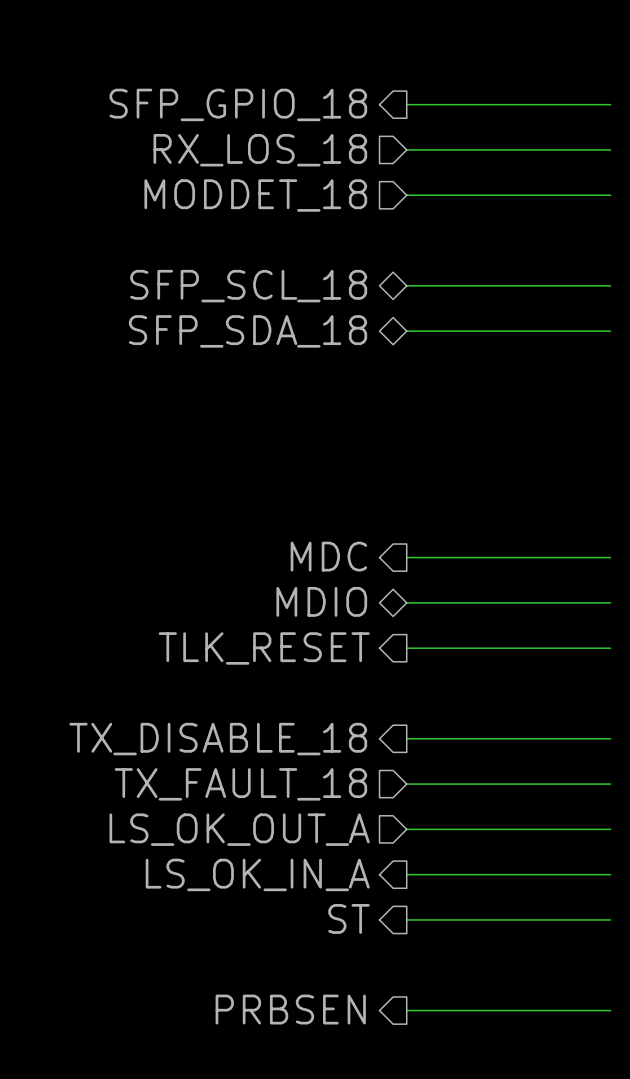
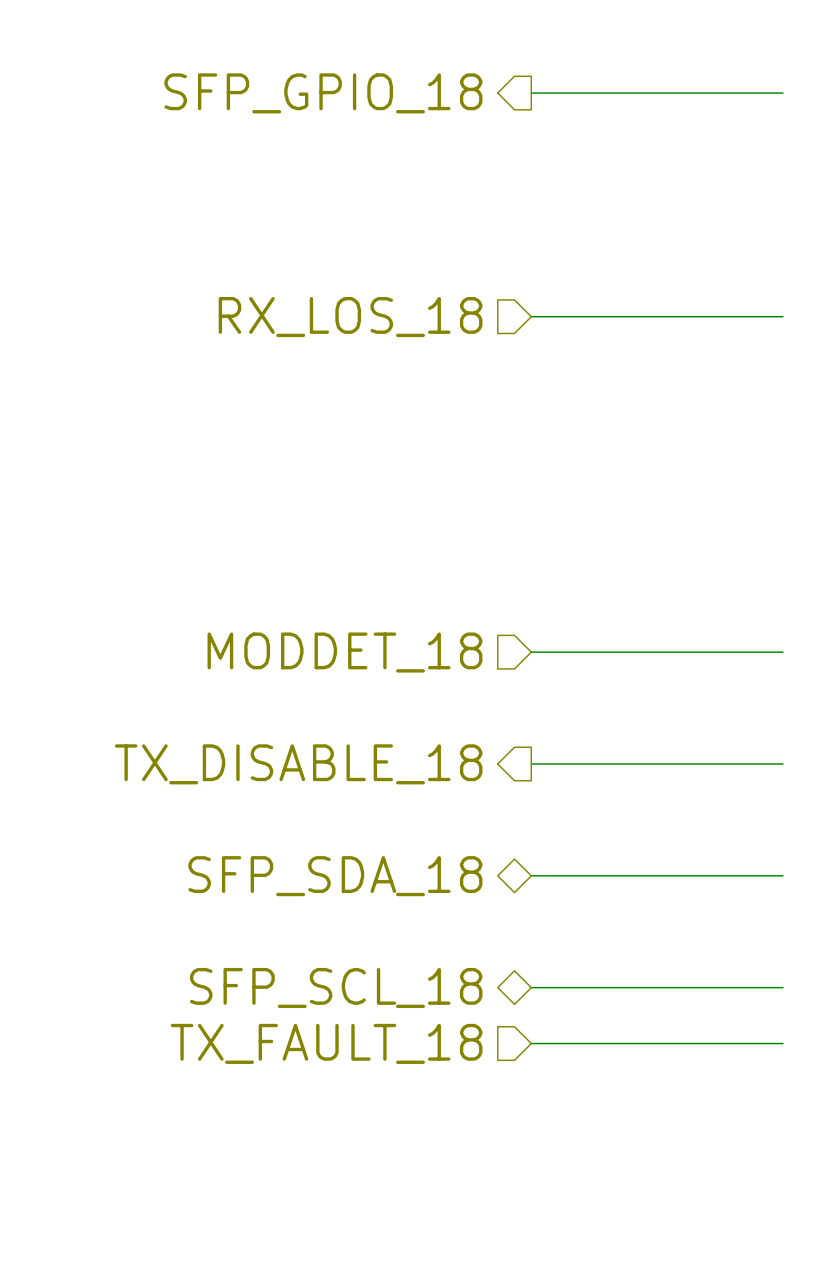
wire: (406, 149) (610, 149) -> none
hierarchical label: RX_LOS_18 (260, 150) -> none
hierarchical label: MODDET_18 (255, 195) -> none
wire: (406, 195) (610, 195) -> none
hierarchical label shape: bidirectional (248, 286) -> input (350, 317)
hierarchical label: SFP_SCL_18 (248, 286) -> RX_LOS_18 (350, 317)
hierarchical label: SFP_SDA_18 (248, 331) -> none
wire: (406, 331) (610, 331) -> none
hierarchical label shape: output (328, 556) -> input (344, 652)
hierarchical label: MDC (328, 556) -> MODDET_18 (344, 652)
hierarchical label: MDIO (321, 601) -> none
wire: (406, 602) (610, 602) -> none
hierarchical label: TLK_RESET (264, 648) -> TX_DISABLE_18 (298, 764)
hierarchical label shape: output (218, 739) -> bidirectional (335, 876)
hierarchical label: TX_DISABLE_18 (218, 739) -> SFP_SDA_18 (335, 876)
hierarchical label: TX_FAULT_18 (240, 784) -> none
wire: (406, 784) (610, 784) -> none
hierarchical label shape: input (239, 829) -> bidirectional (336, 987)
hierarchical label: LS_OK_OUT_A (239, 829) -> SFP_SCL_18 (336, 987)
hierarchical label shape: output (257, 874) -> input (326, 1043)
hierarchical label: LS_OK_IN_A (257, 874) -> TX_FAULT_18 (326, 1043)
hierarchical label: ST (348, 918) -> none
wire: (406, 919) (610, 919) -> none
hierarchical label: PRBSEN (290, 1009) -> none
wire: (406, 1010) (610, 1010) -> none

